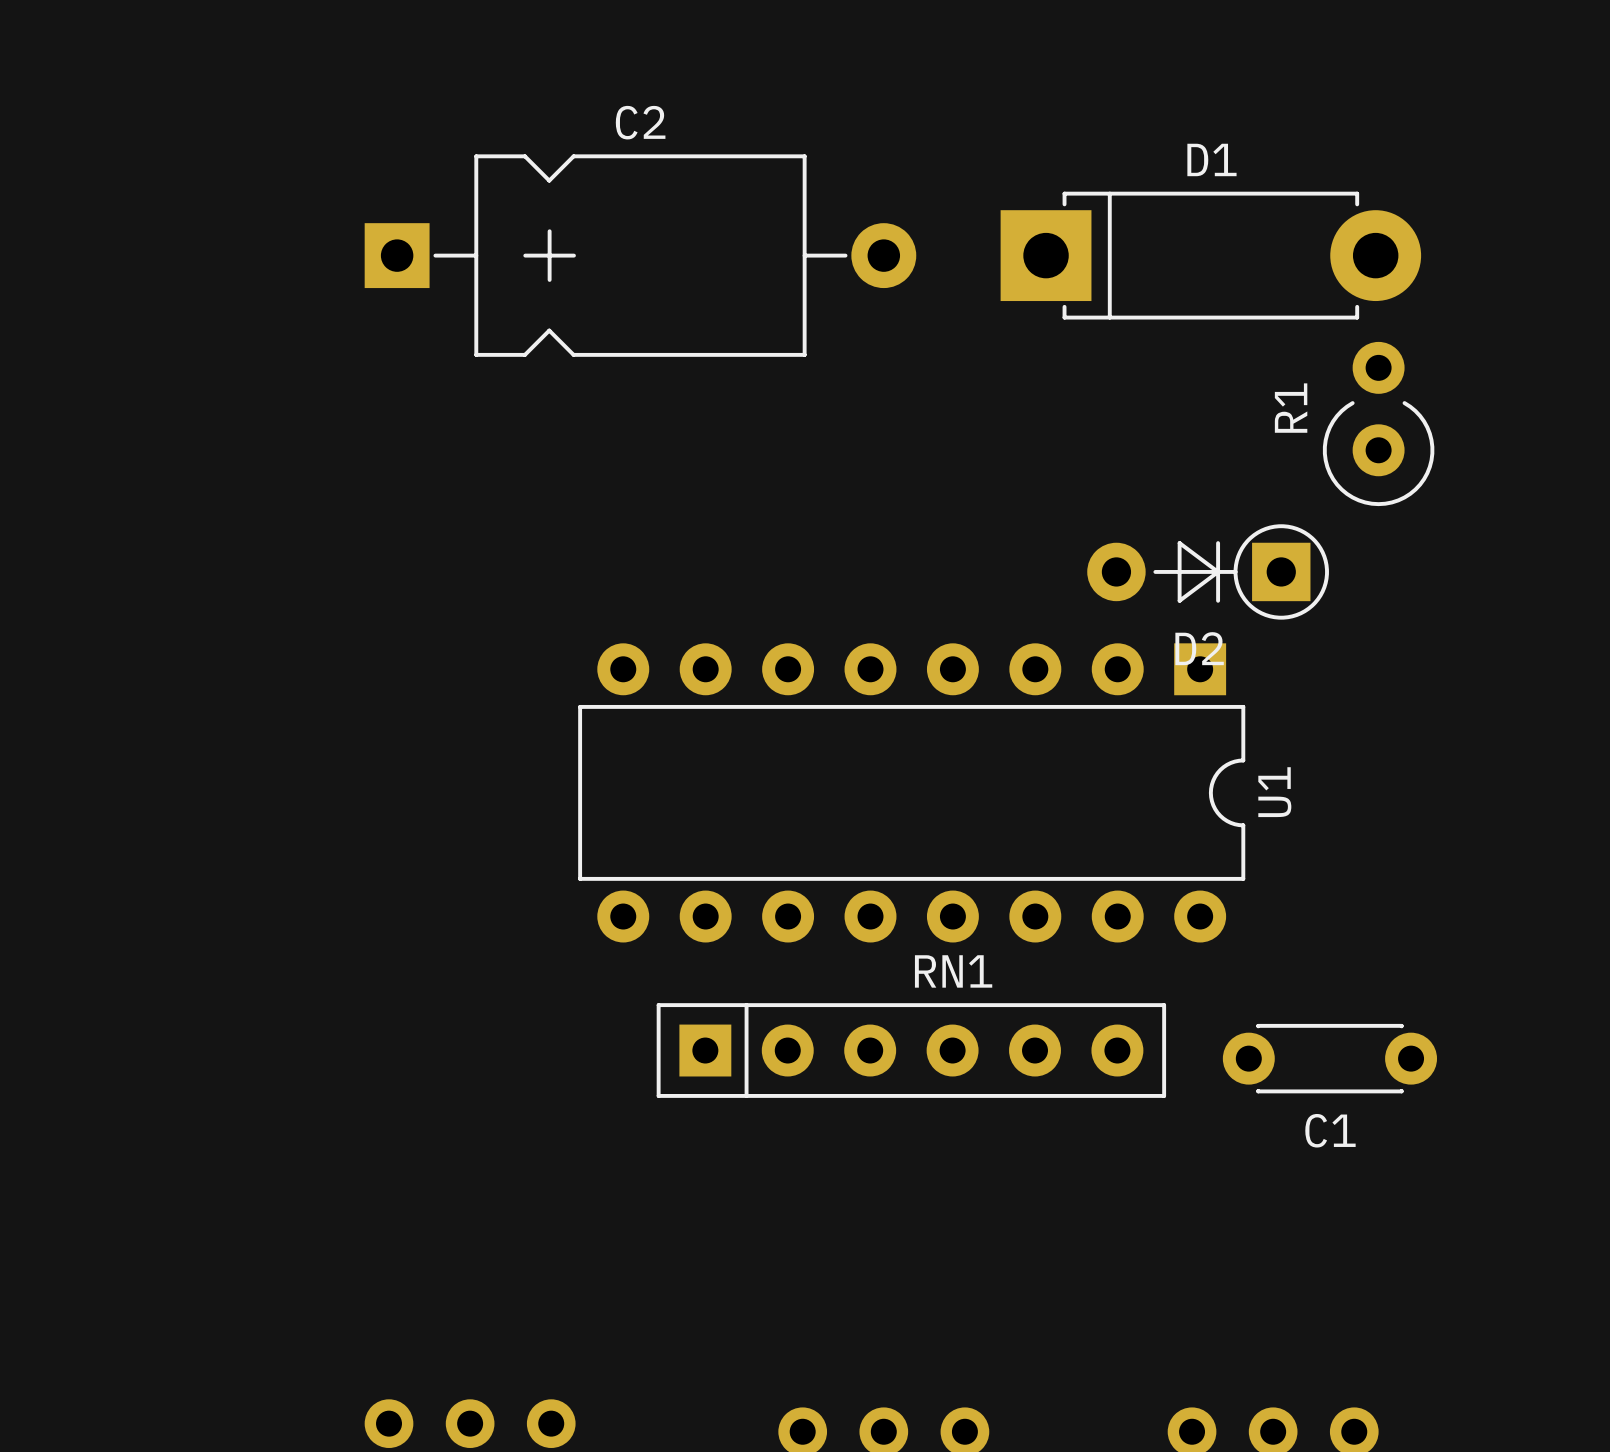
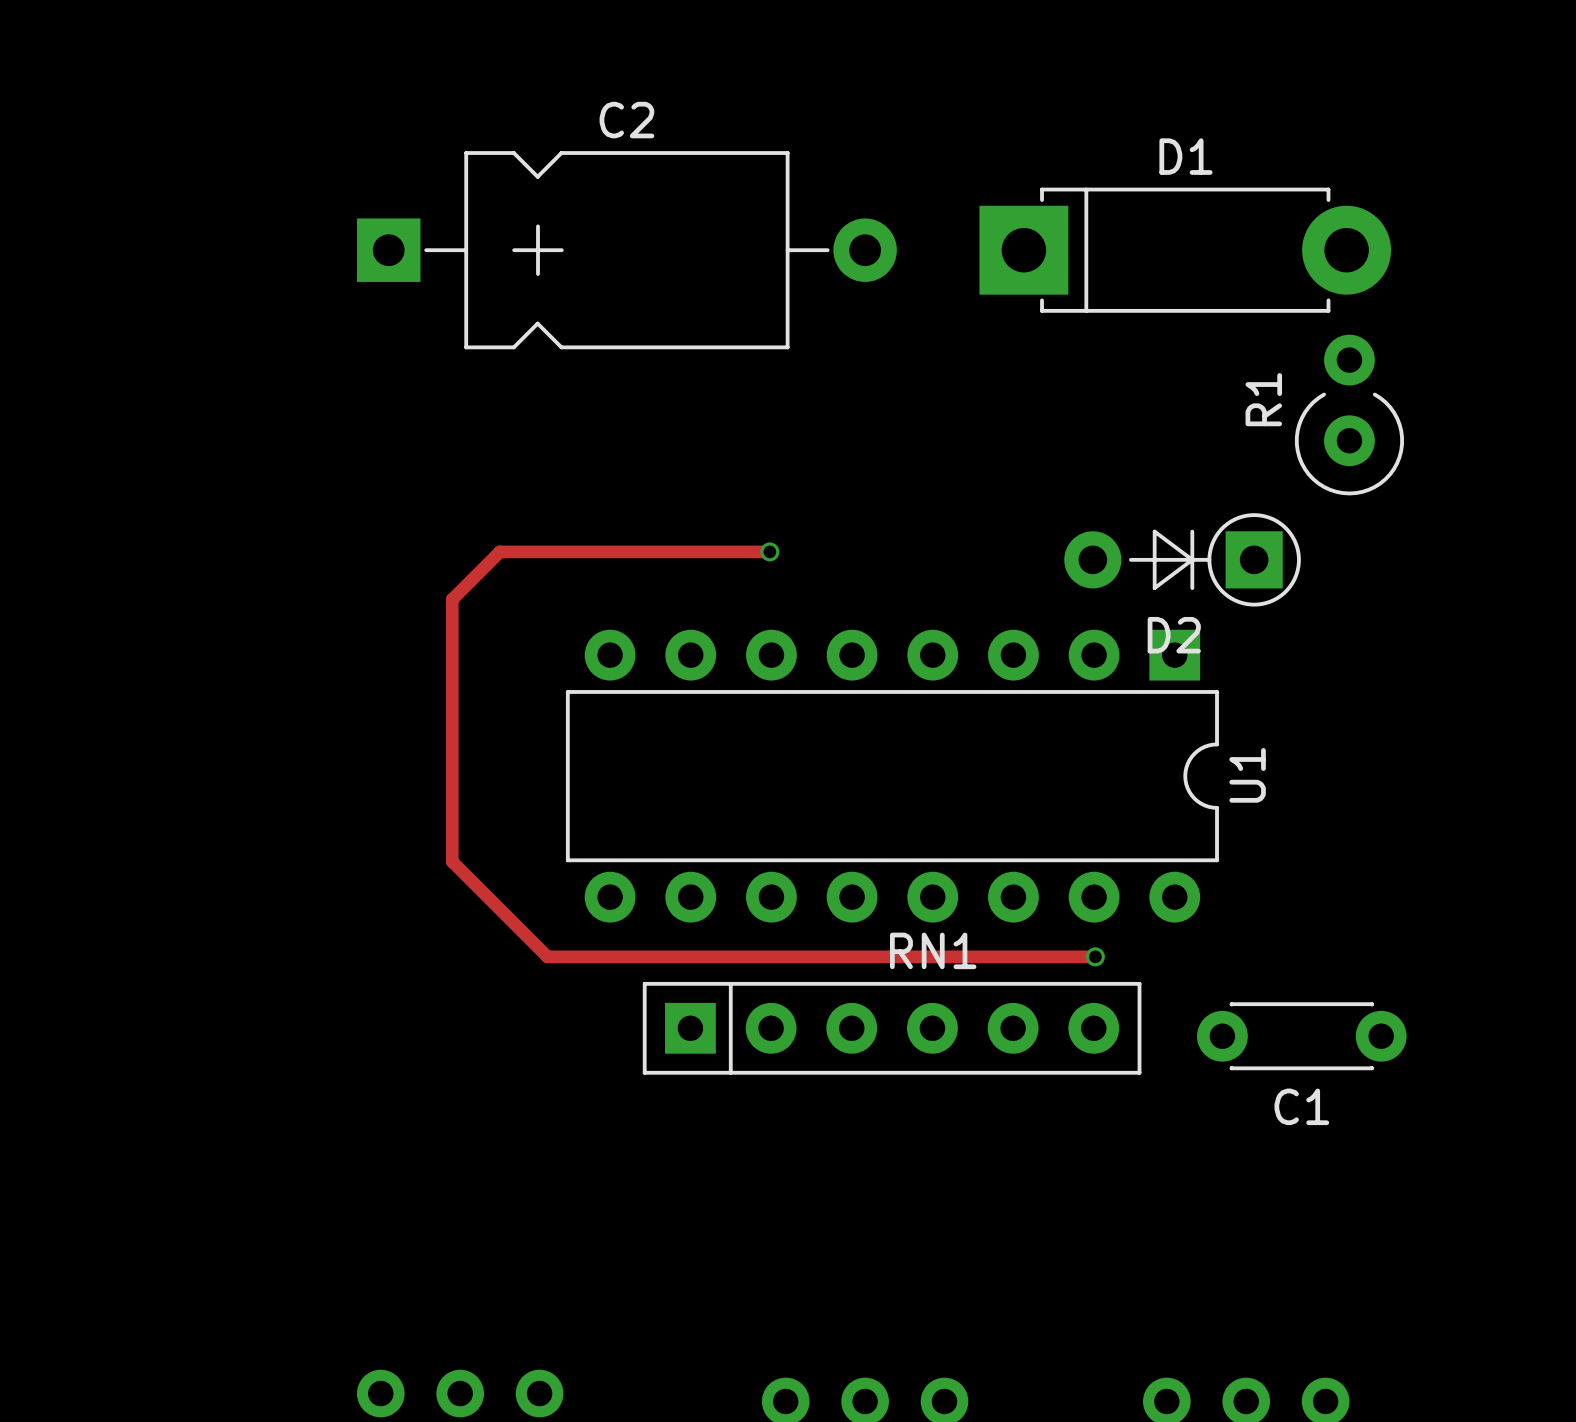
track: none -> (769, 551) (499, 551) (452, 599) (452, 861) (547, 956) (1095, 956)
via: none -> (769, 551)
via: none -> (1095, 956)

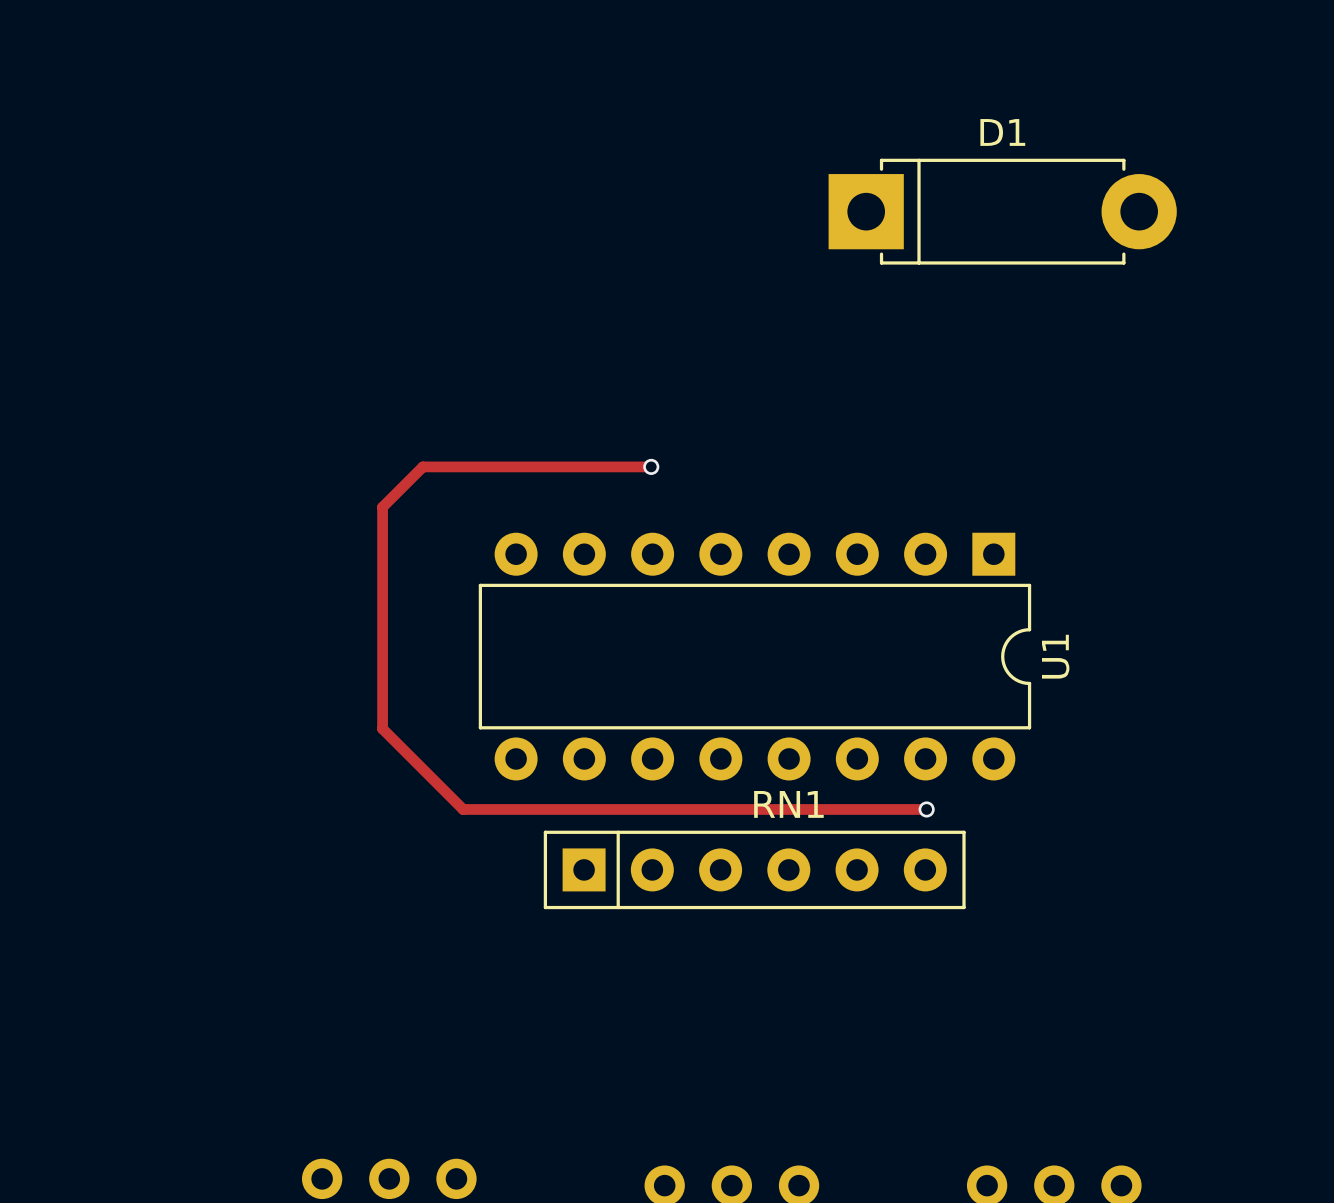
C2: (626, 250) -> none
R1: (1349, 415) -> none
D2: (1182, 559) -> none
C1: (1301, 1036) -> none

